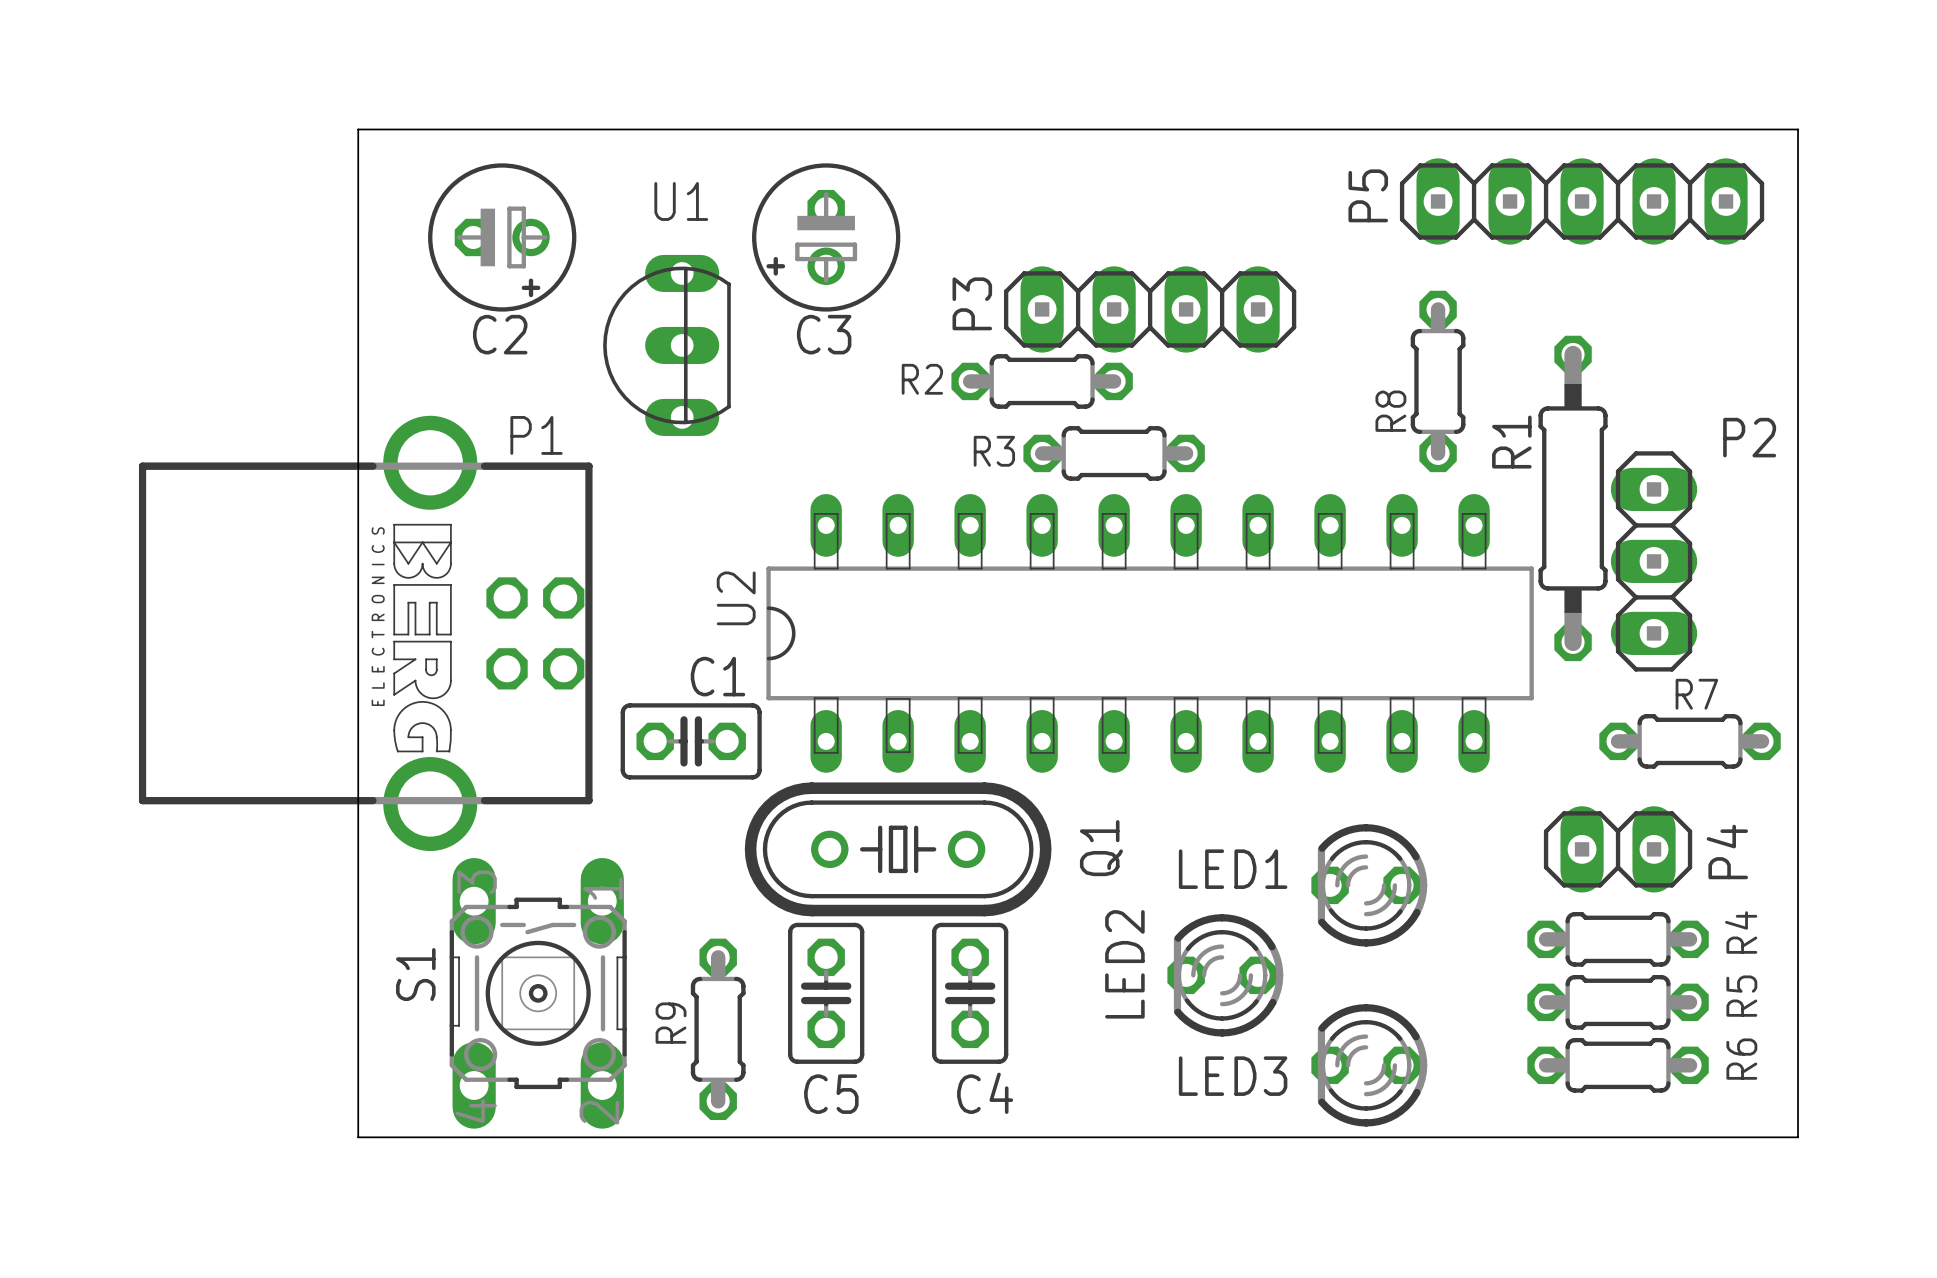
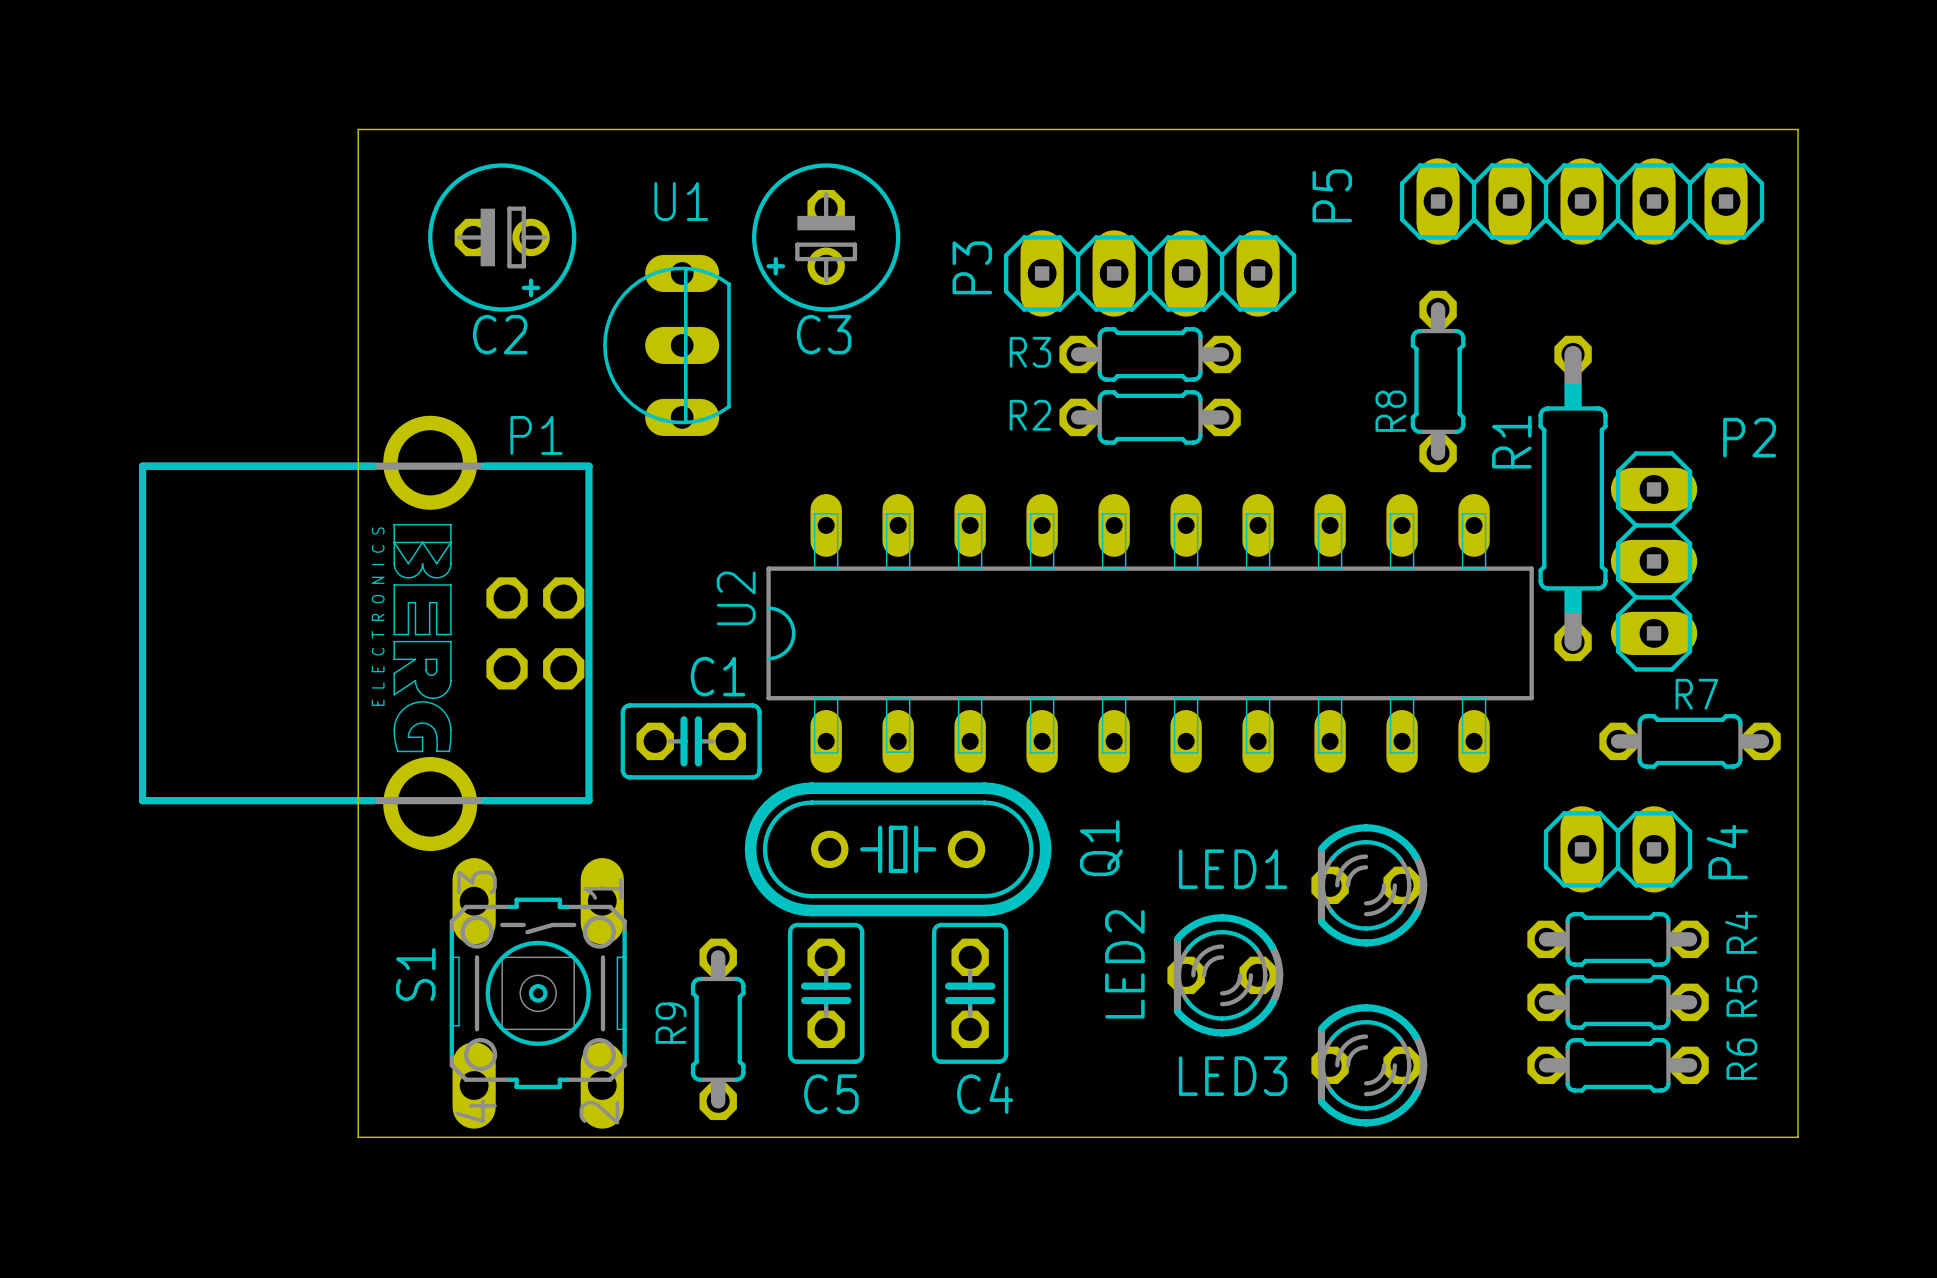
P5 name position: P5 (1368, 195) -> P5 (1332, 195)
P3 position: (1150, 309) -> (1150, 273)
R2 position: (1042, 381) -> (1150, 417)
R3 position: (1114, 453) -> (1150, 354)

